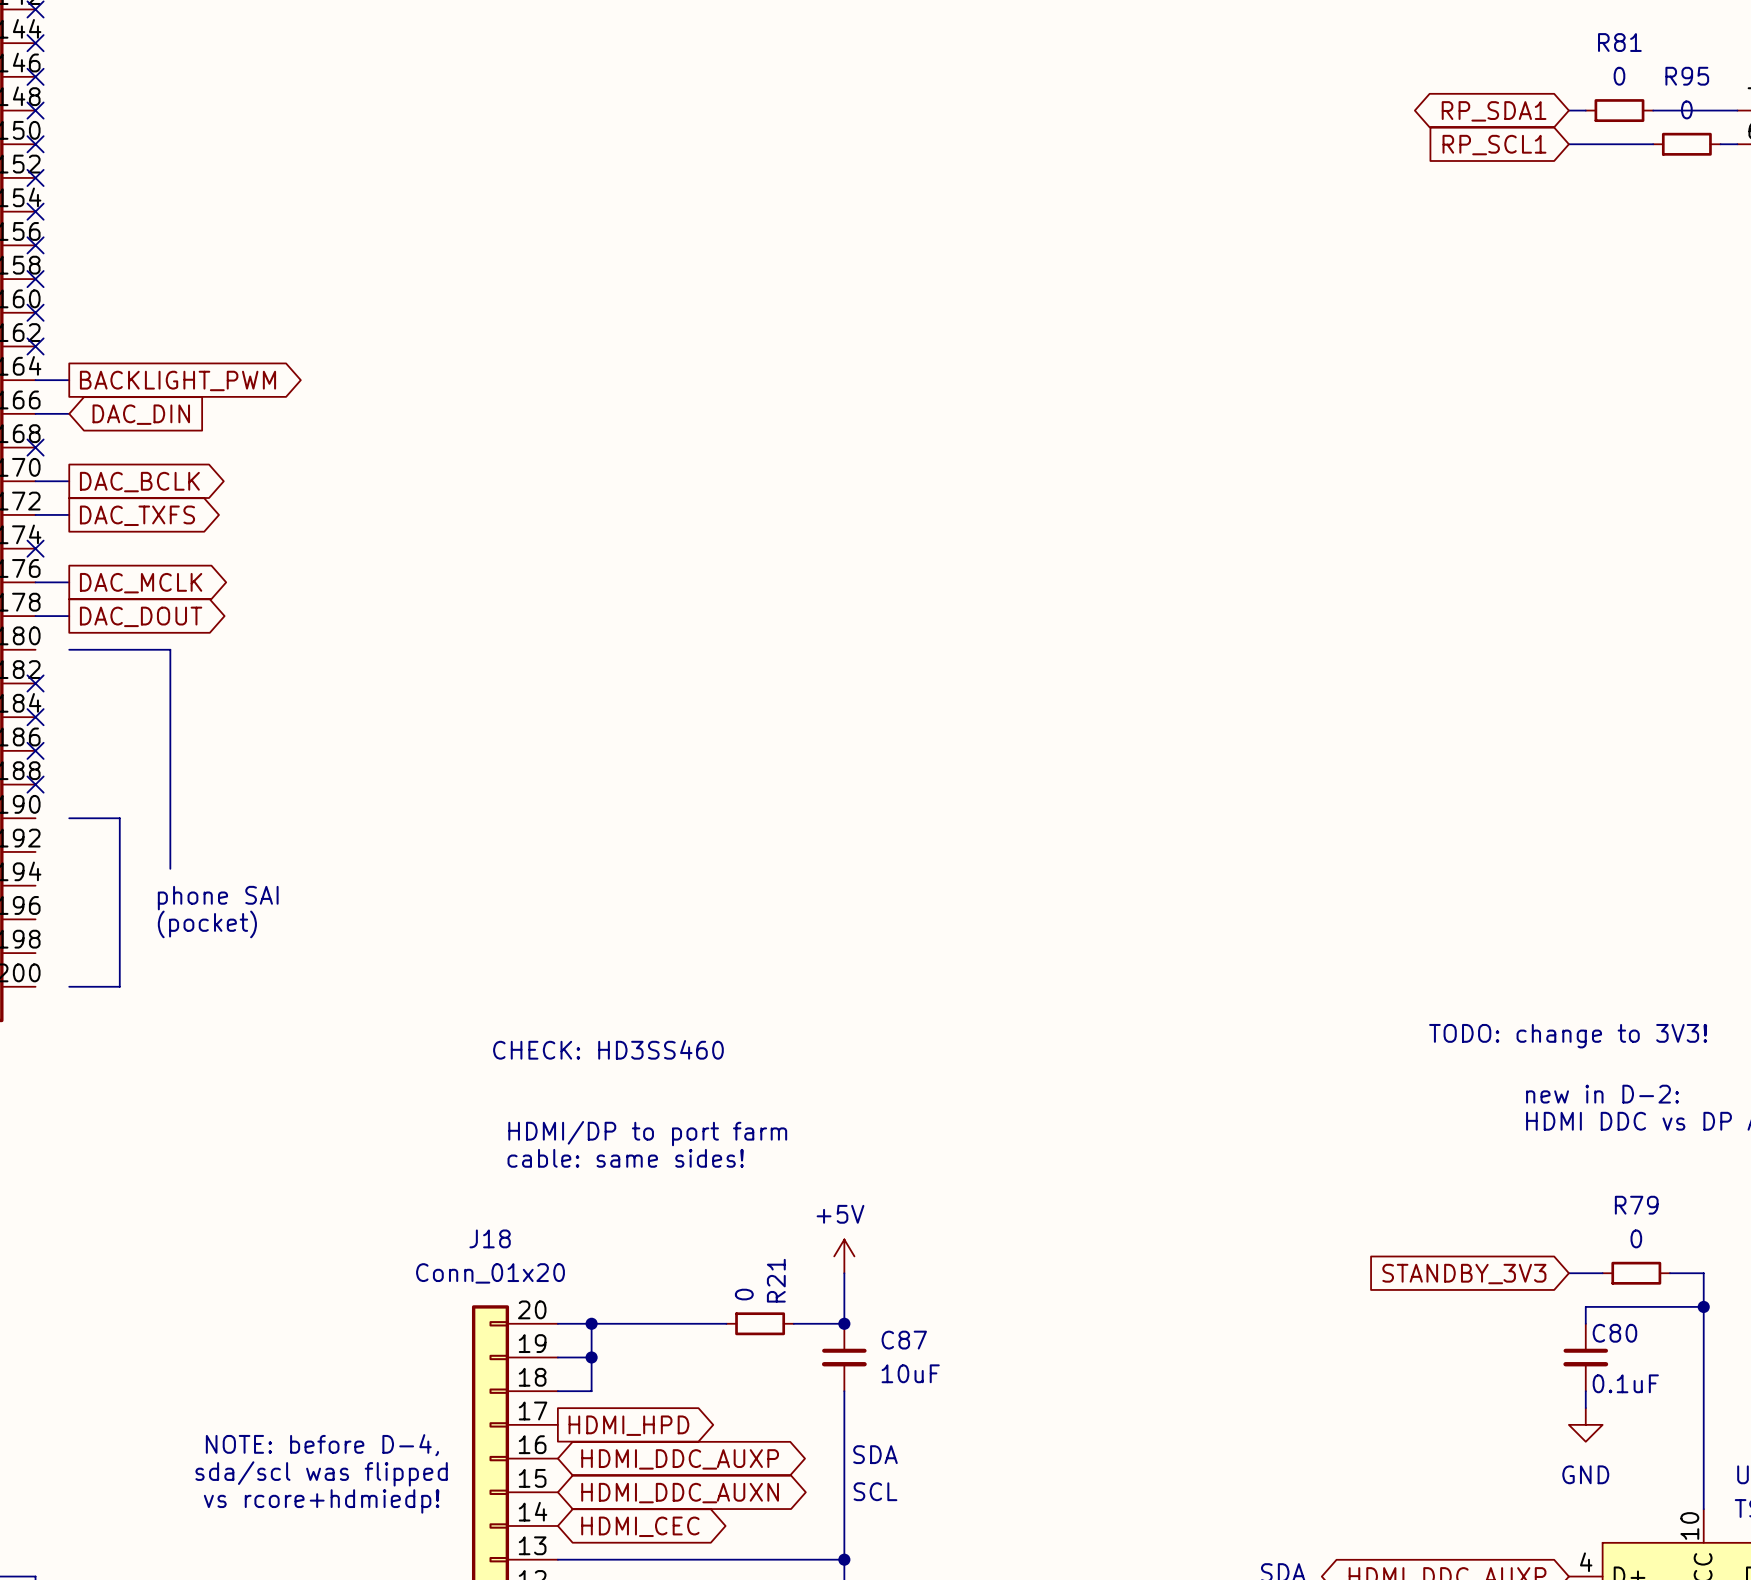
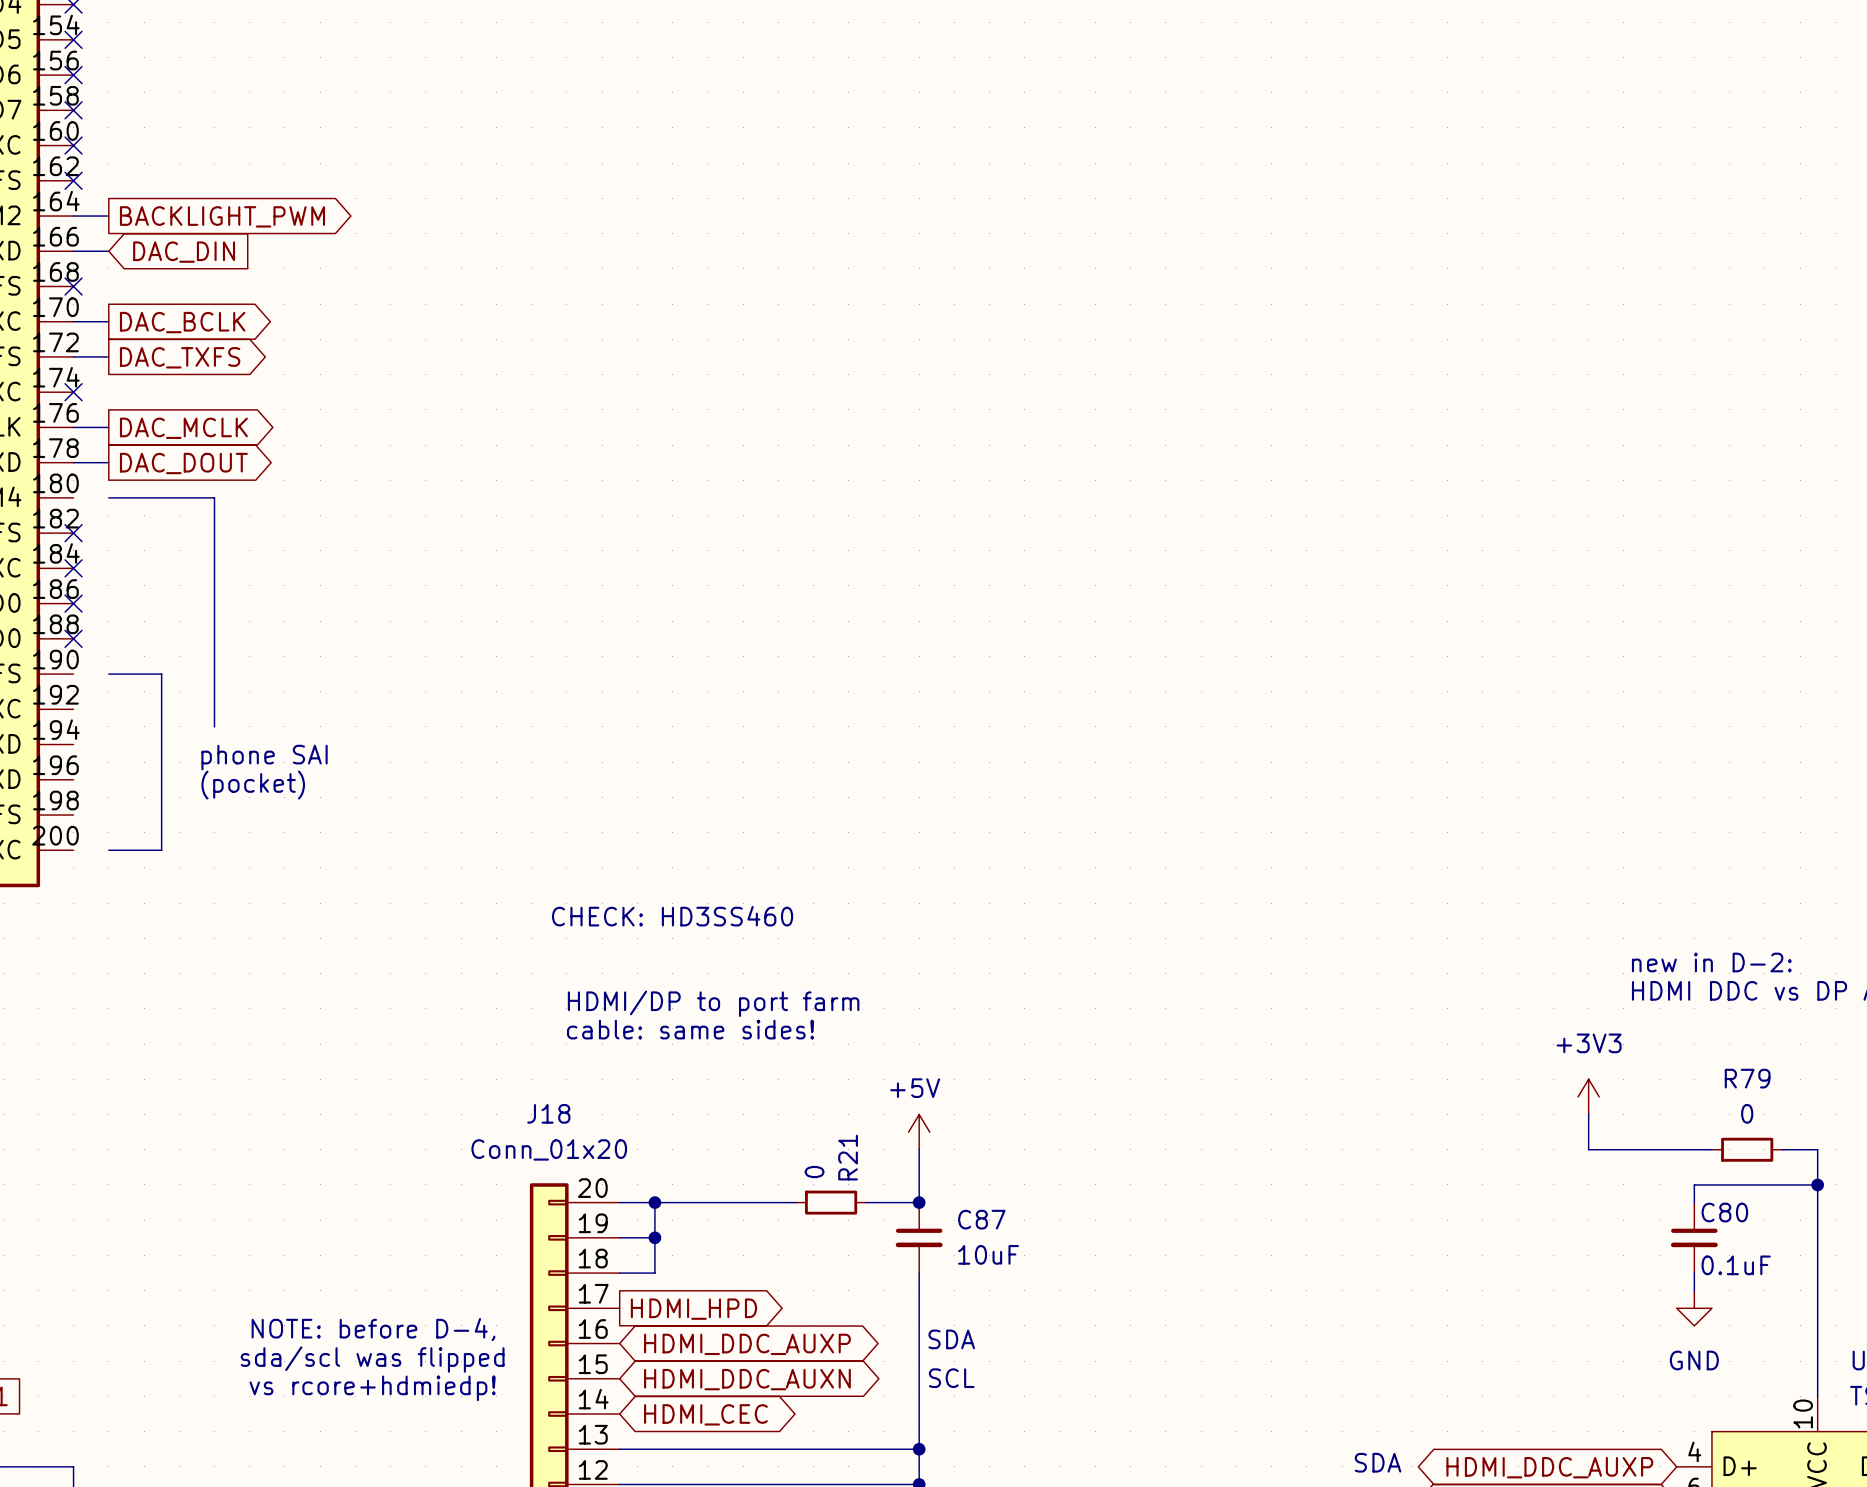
text: TODO: change to 3V3! (1568, 1036) -> none
power symbol: none -> +3V3 (1588, 1096)
wire: none -> (1588, 1114) (1588, 1149) (1676, 1149)
global label: STANDBY_3V3 (1464, 1274) -> none

